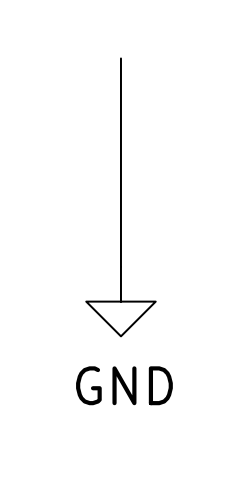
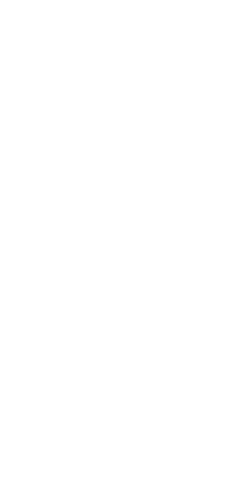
wire: (120, 58) (120, 266) -> none
power symbol: GND (120, 301) -> none

